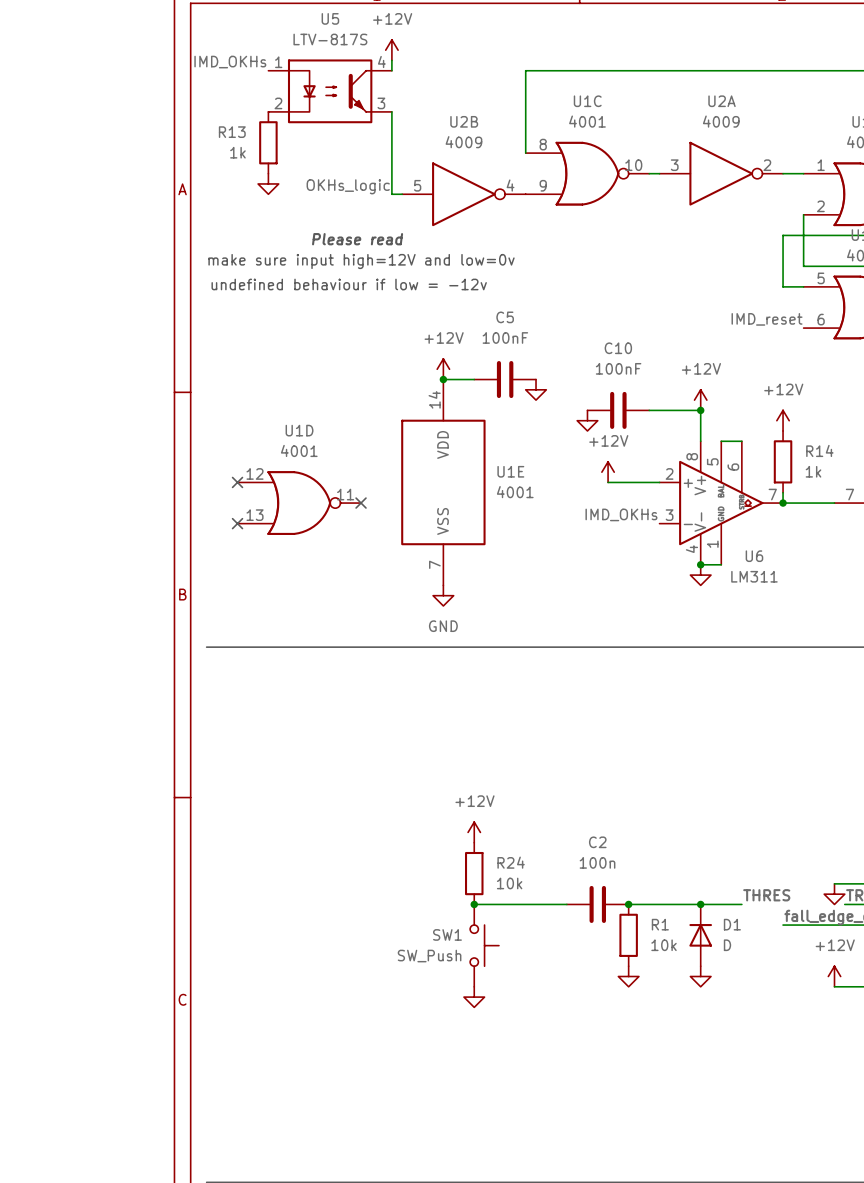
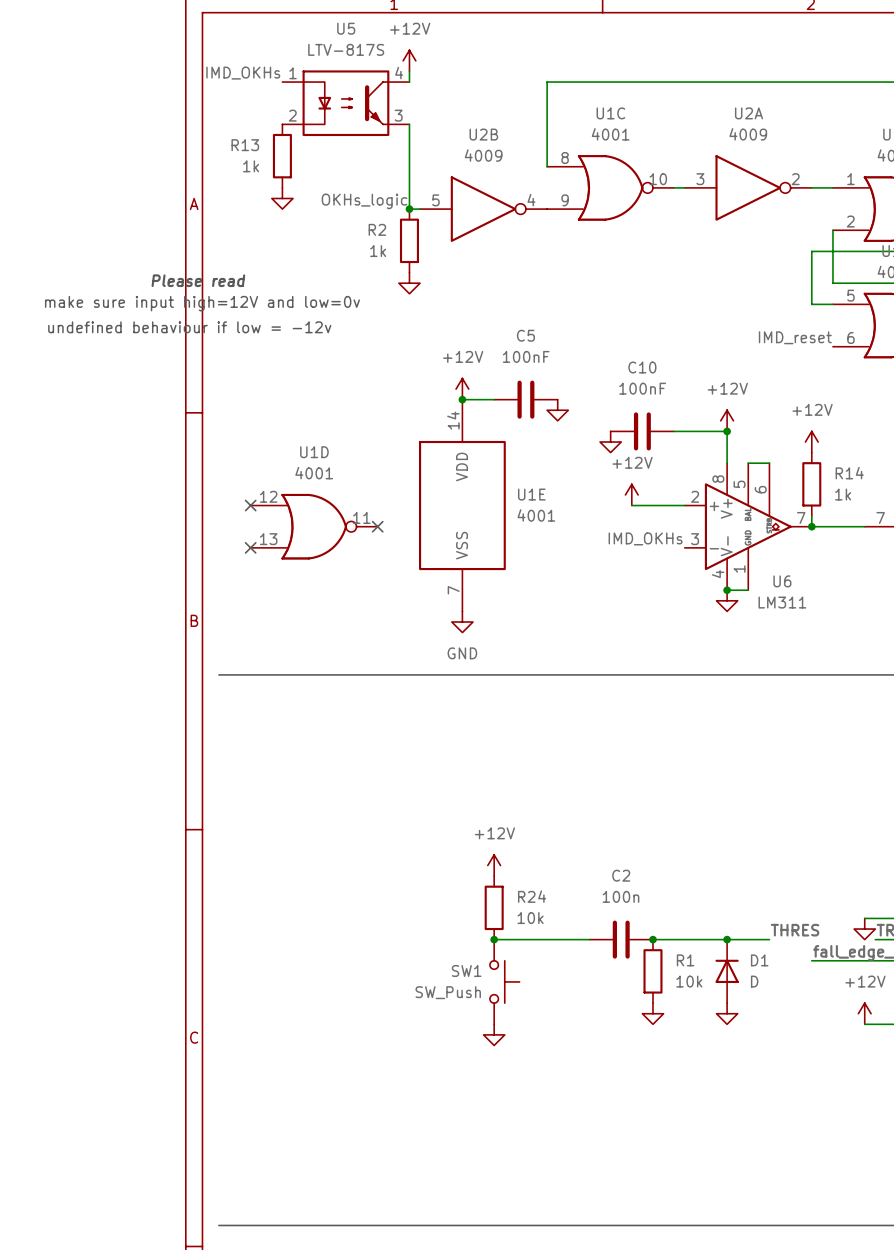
junction: none -> (409, 209)
R2: none -> 1k (409, 240)
text position: Please read (357, 239) -> Please read (198, 280)
text position: make sure input high=12V and low=0v (361, 261) -> make sure input high=12V and low=0v (202, 303)
power symbol: none -> (409, 283)
text position: undefined behaviour if low = -12v (349, 284) -> undefined behaviour if low = -12v (189, 327)

